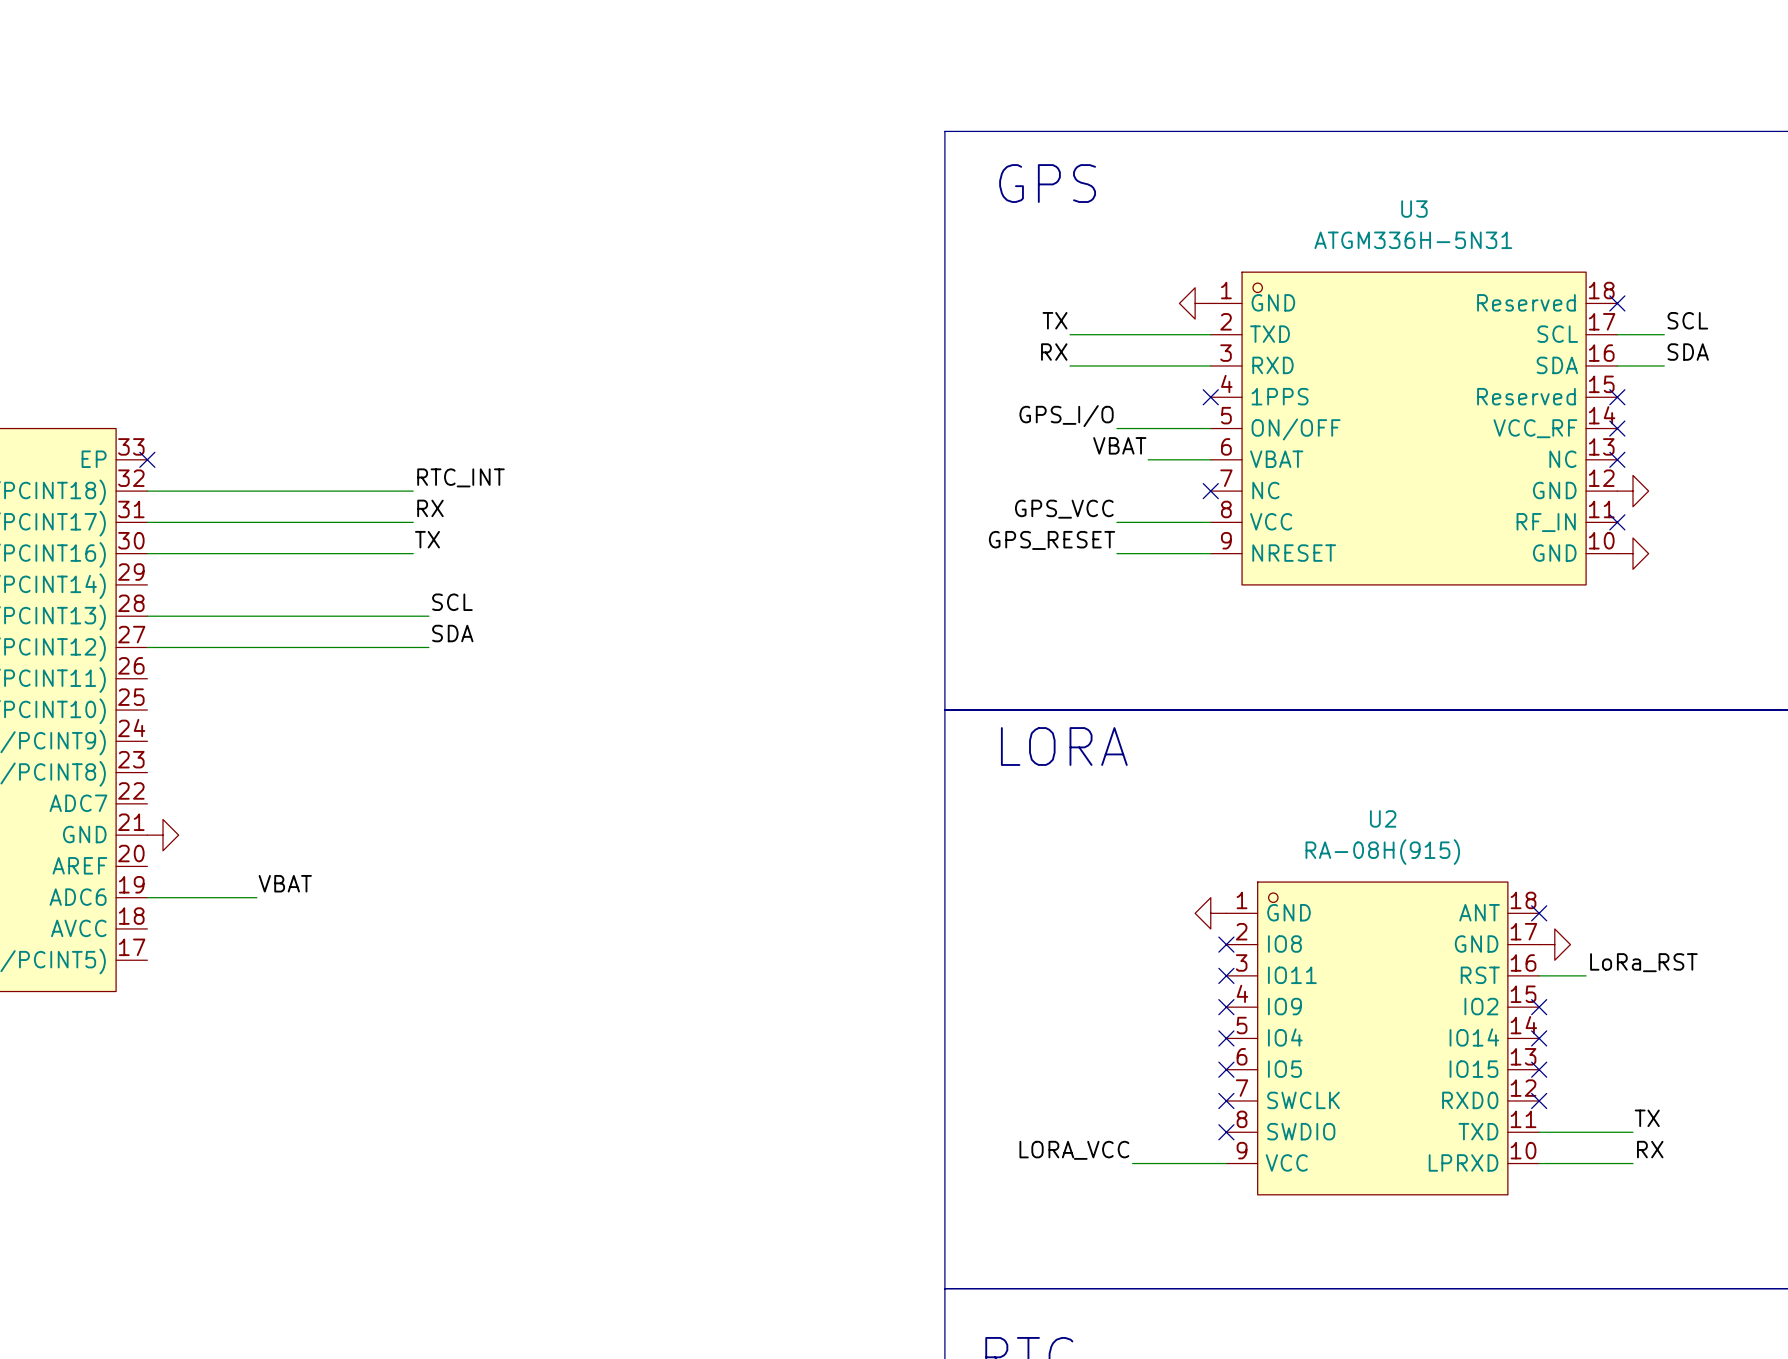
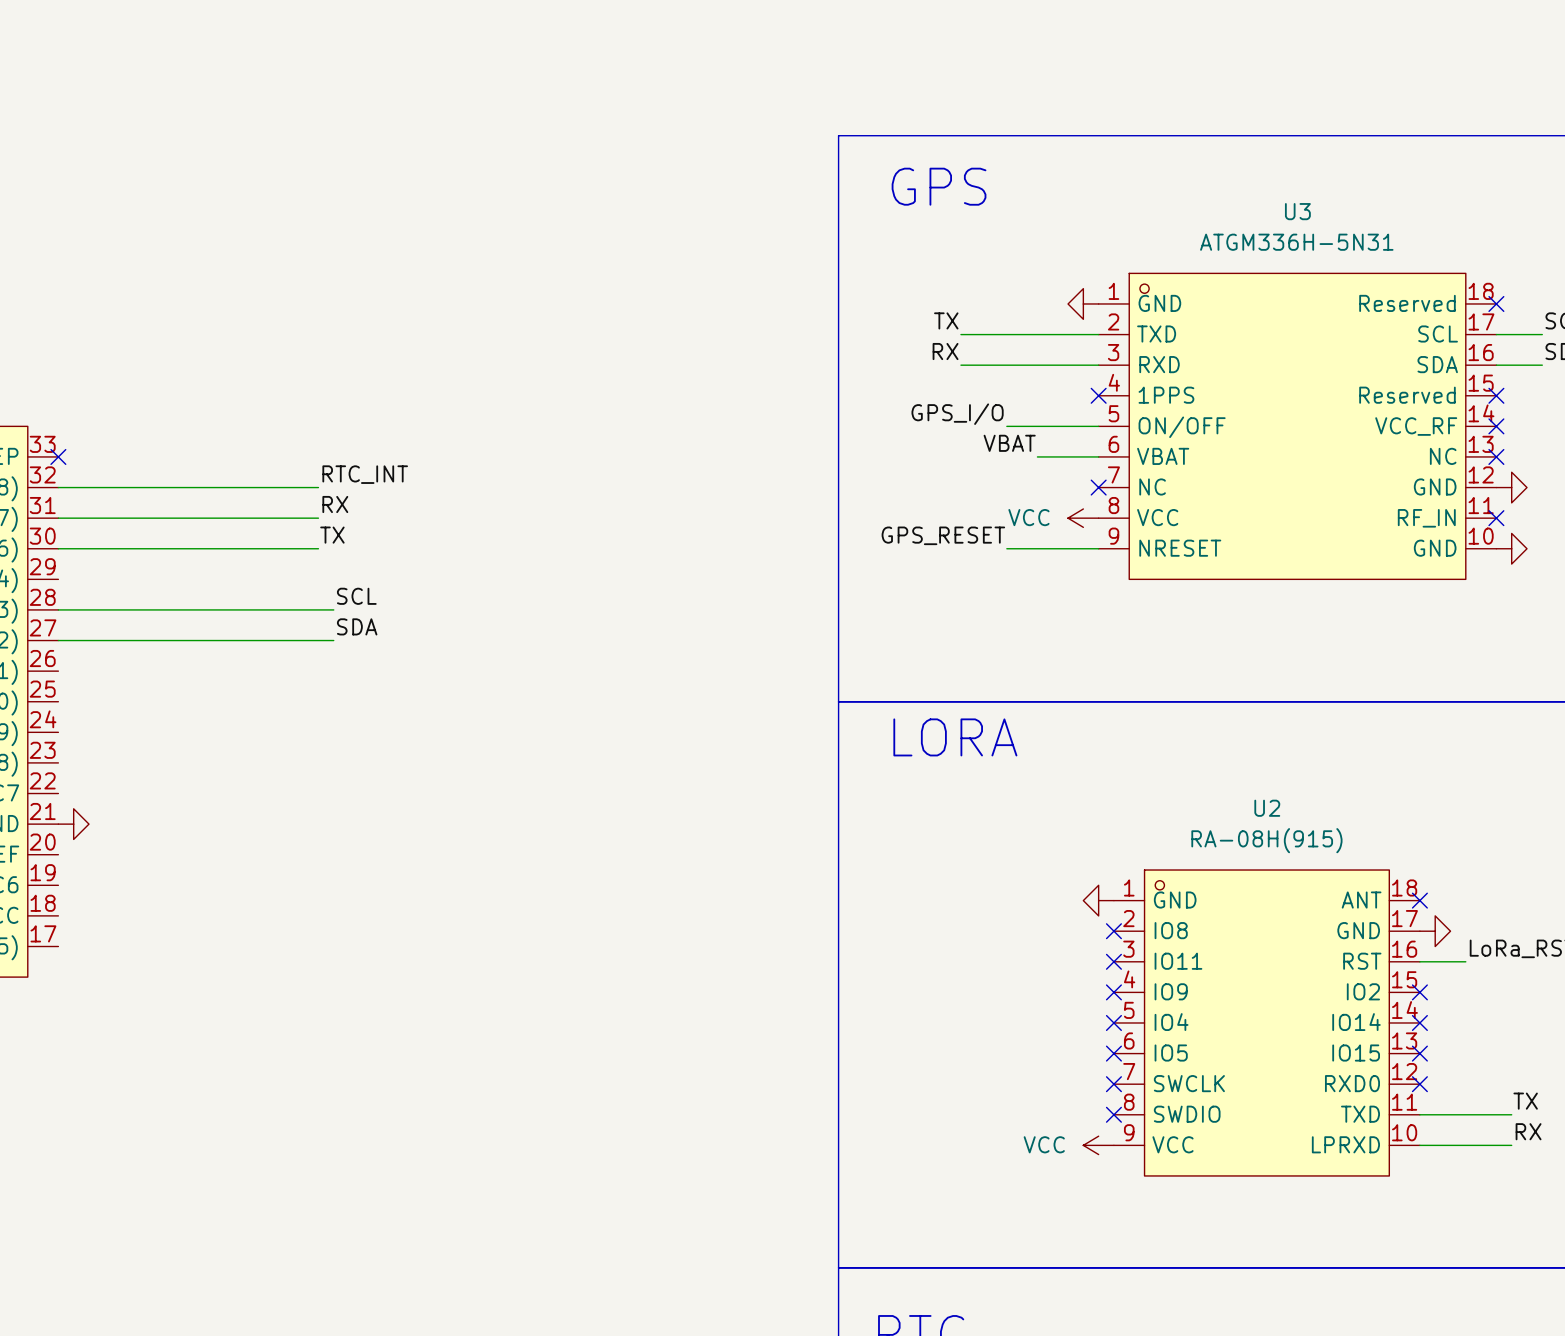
label: GPS_VCC (1064, 509) -> none
wire: (1116, 522) (1210, 522) -> none
power symbol: none -> VCC (1083, 518)
label: VBAT (285, 883) -> none
wire: (147, 897) (256, 897) -> none
label: LORA_VCC (1074, 1150) -> none
wire: (1132, 1163) (1226, 1163) -> none
power symbol: none -> VCC (1098, 1145)

